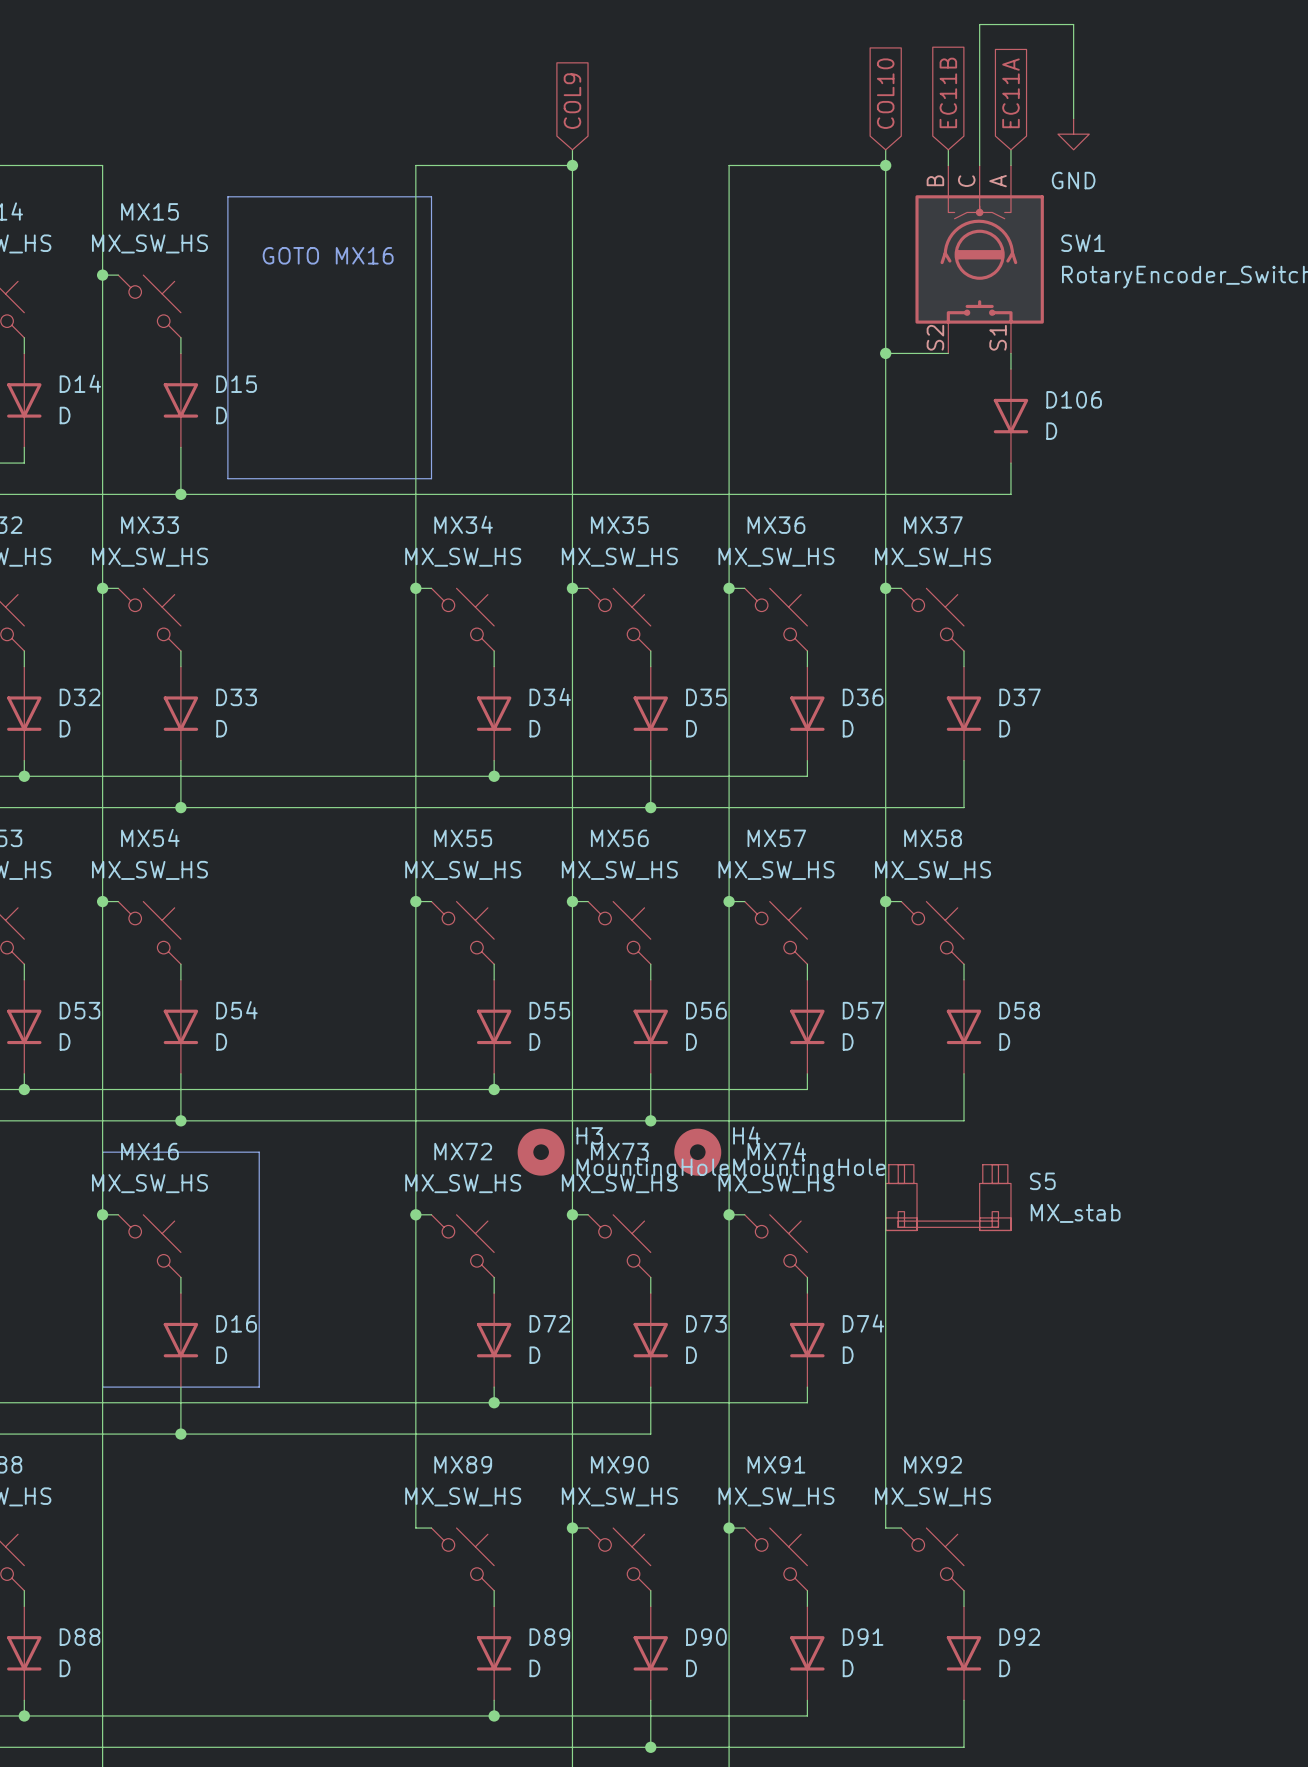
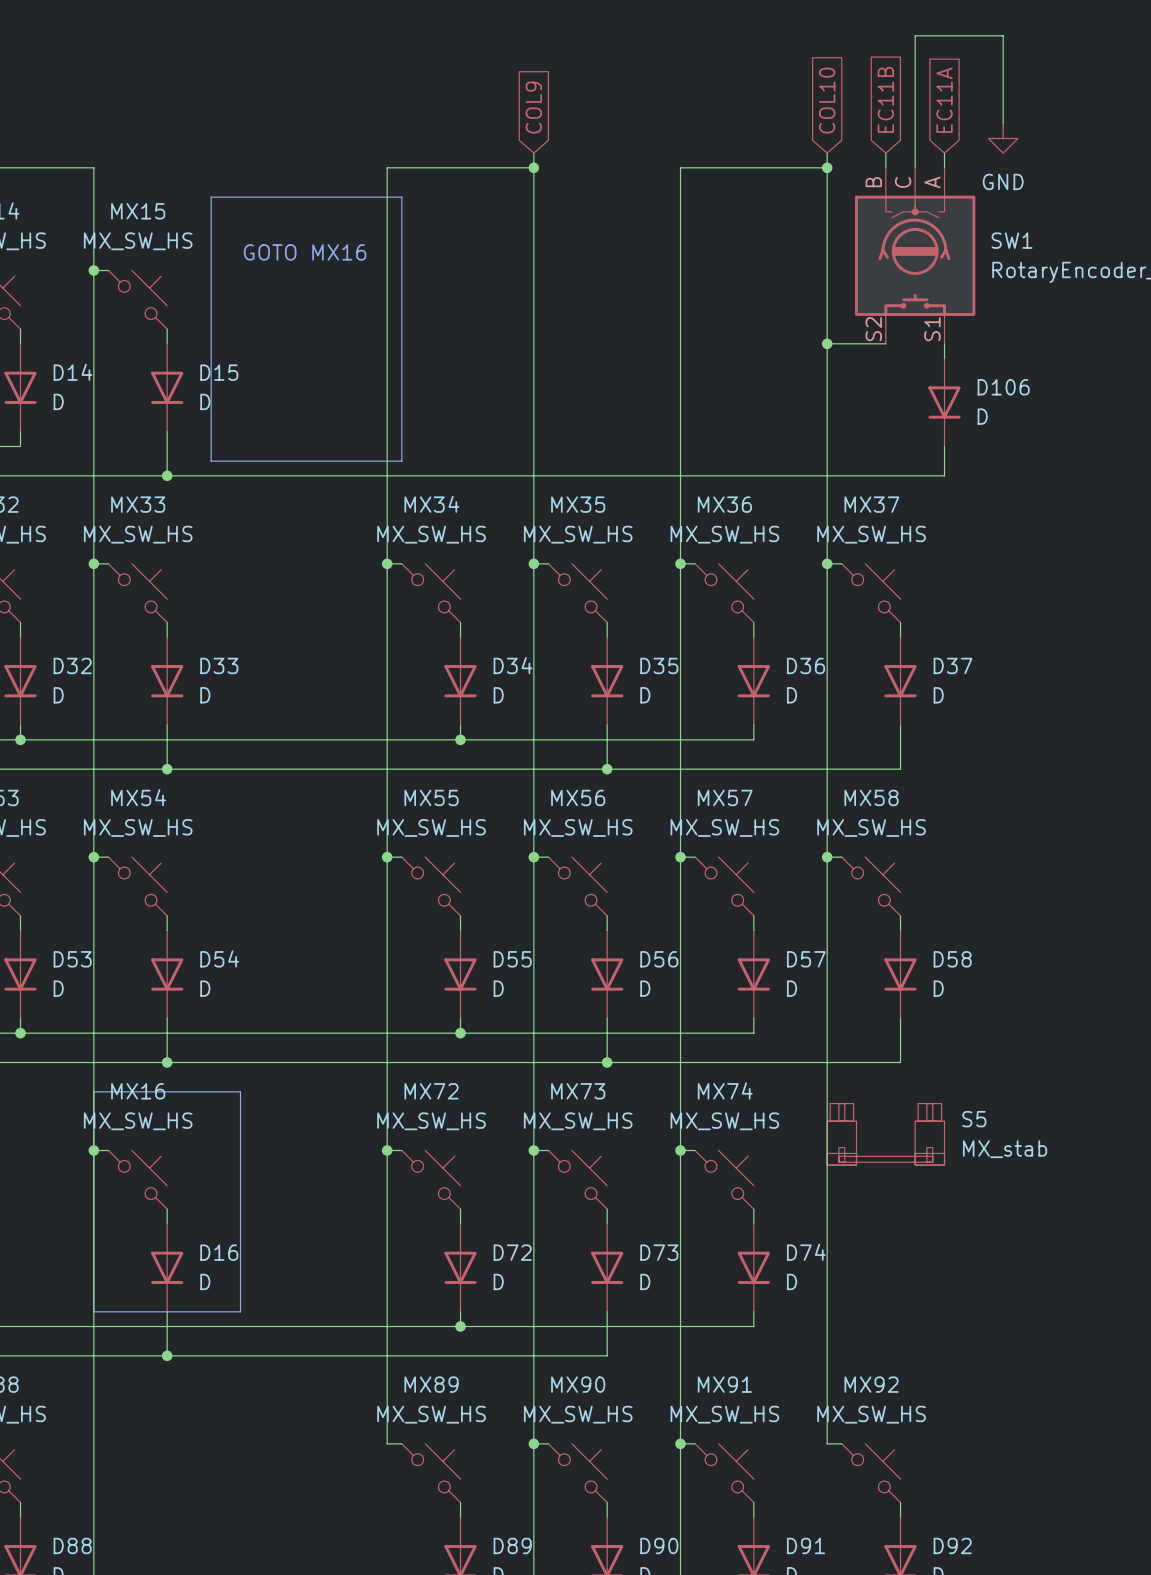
H3: MountingHole (541, 1152) -> none
H4: MountingHole (697, 1152) -> none

